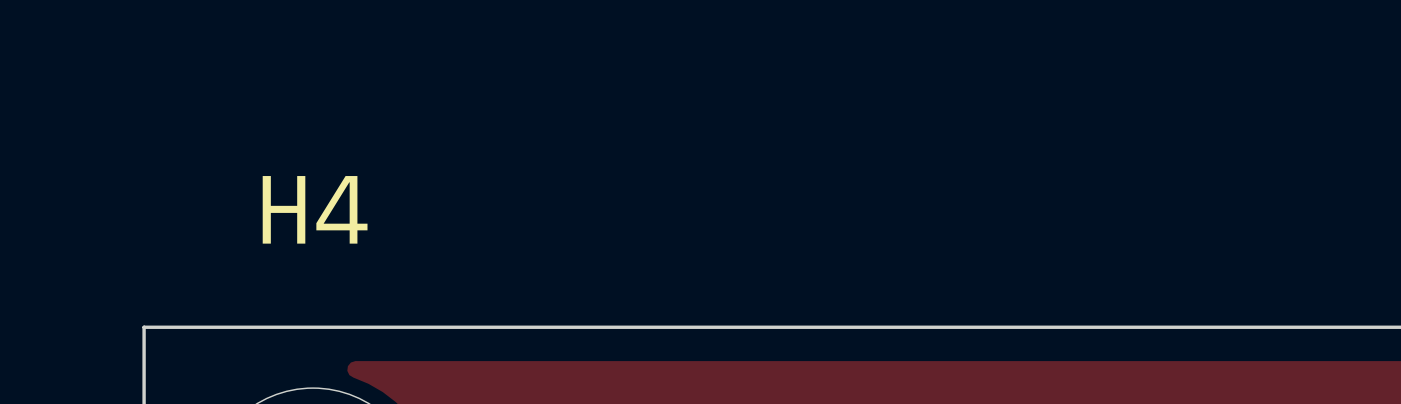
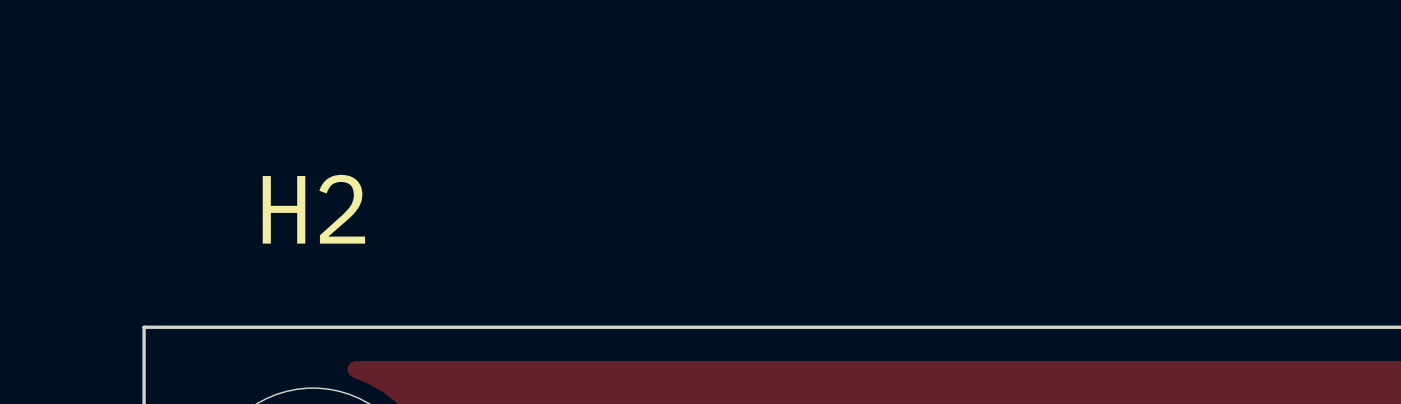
H4 name: H4 (315, 209) -> H2 (313, 209)

